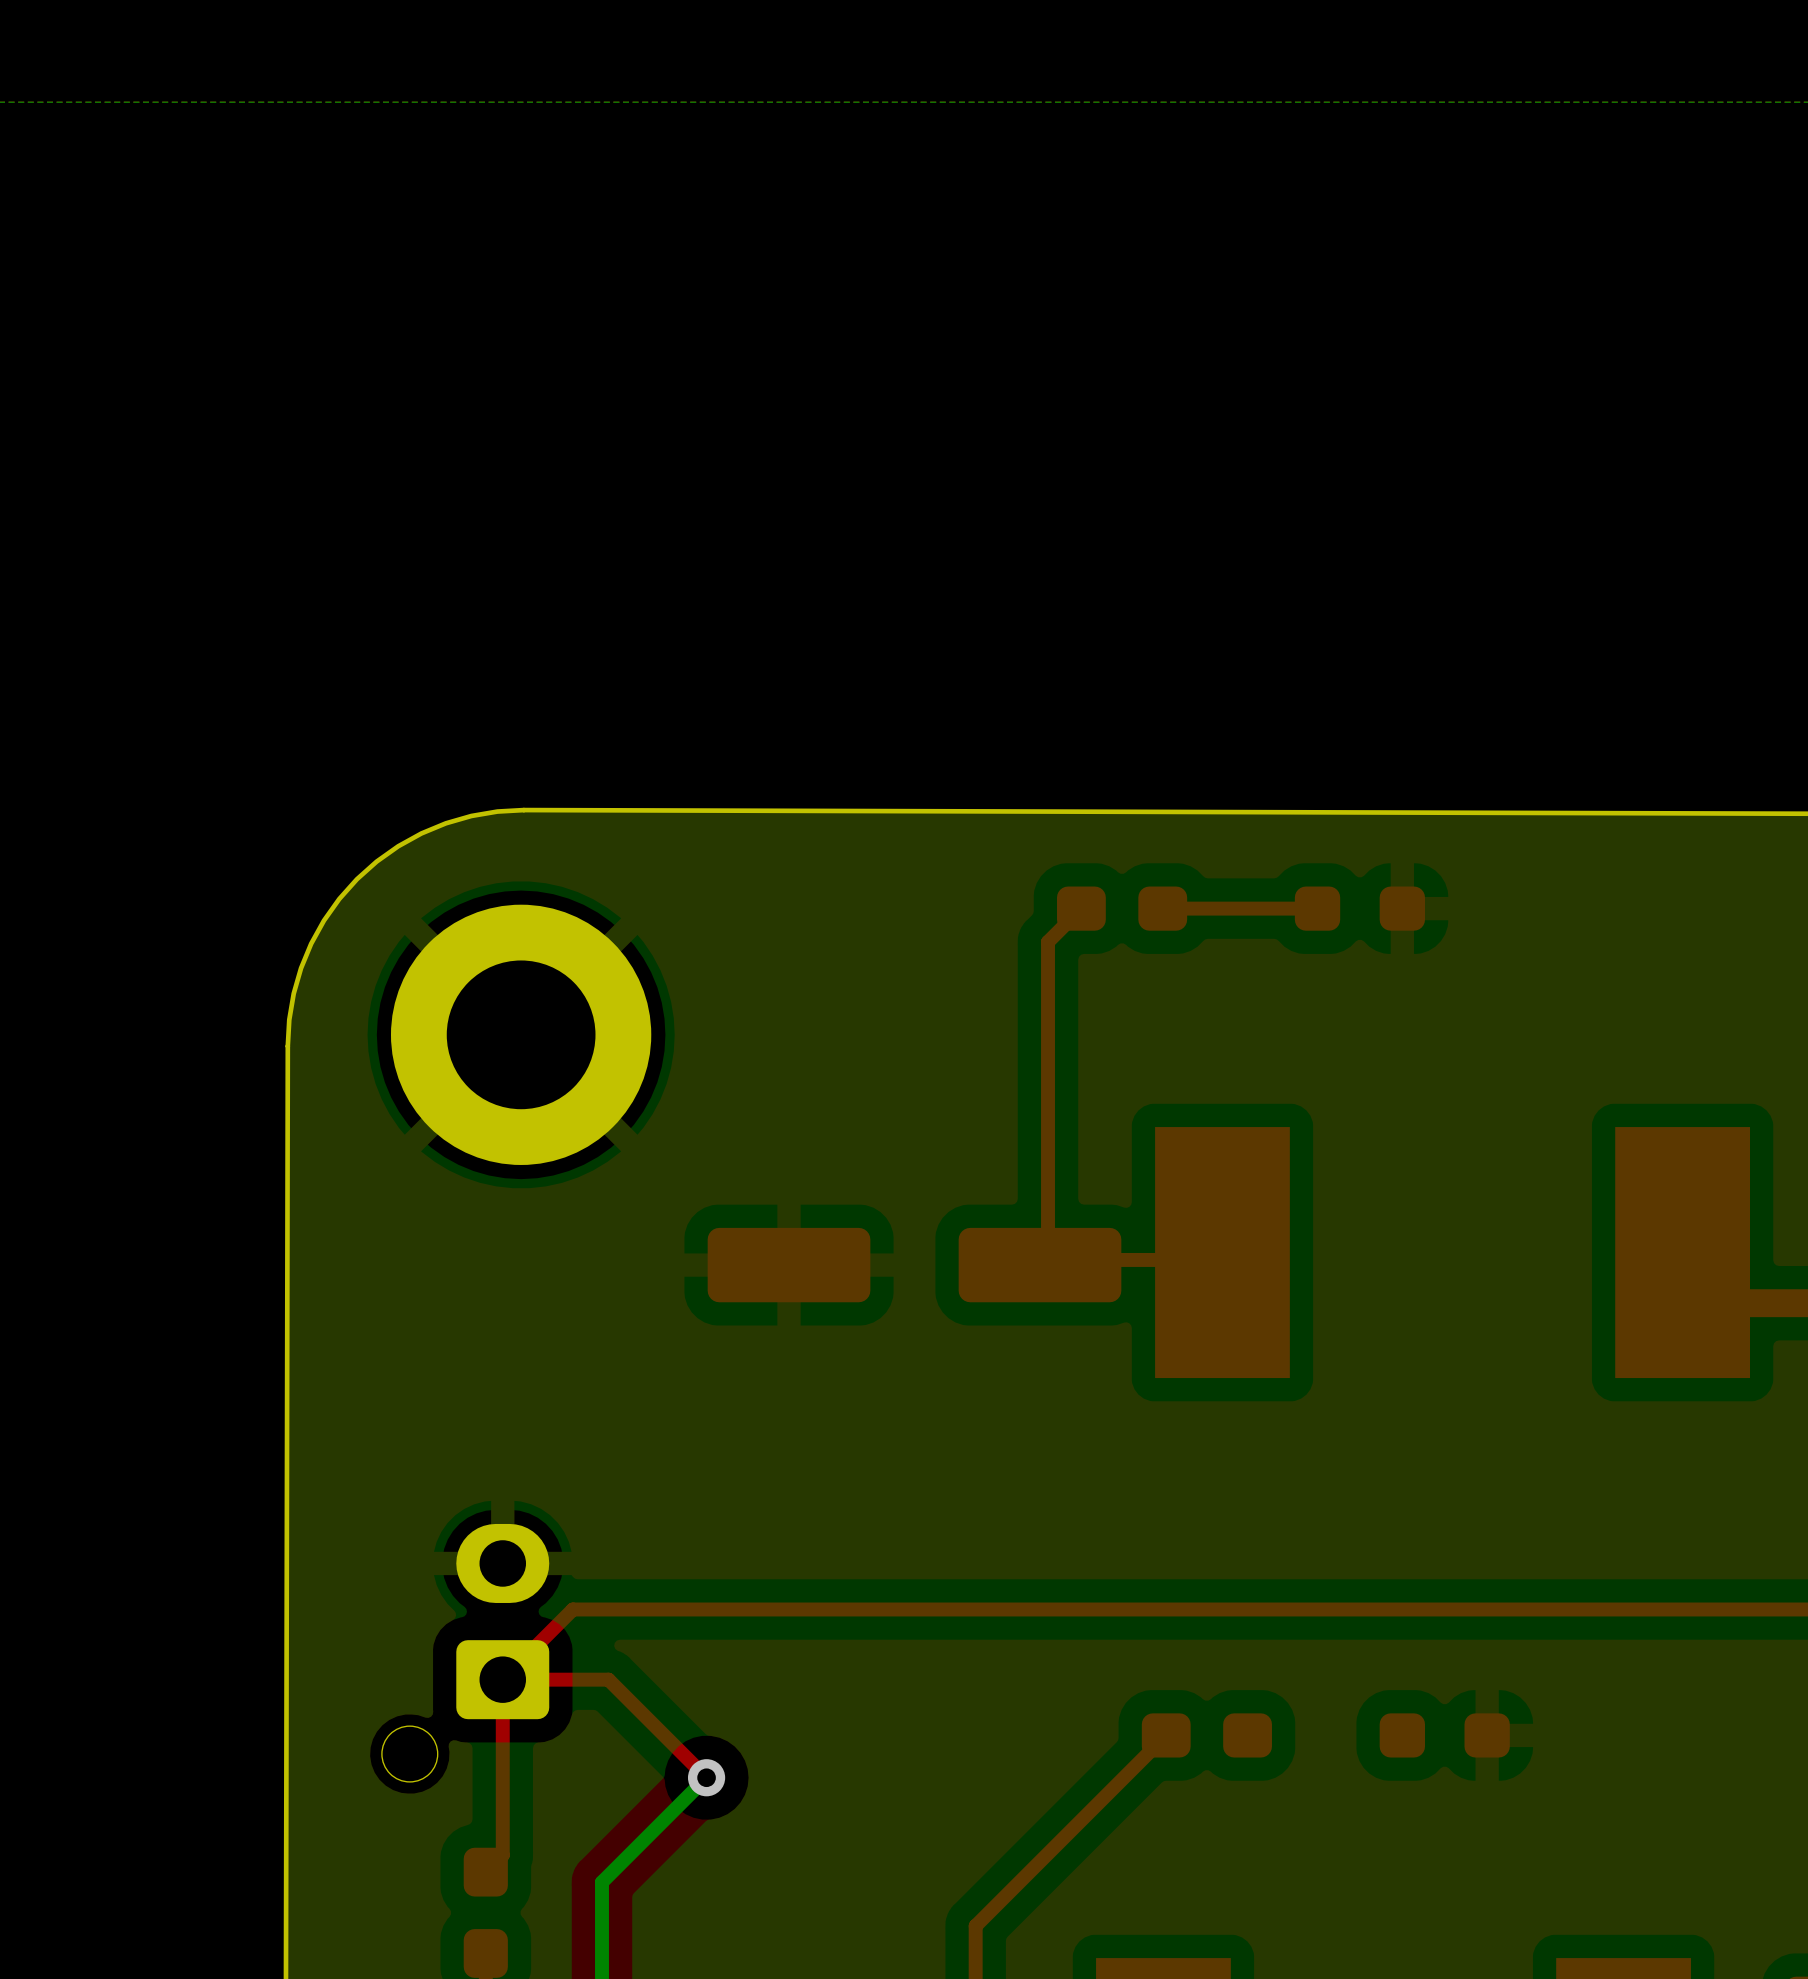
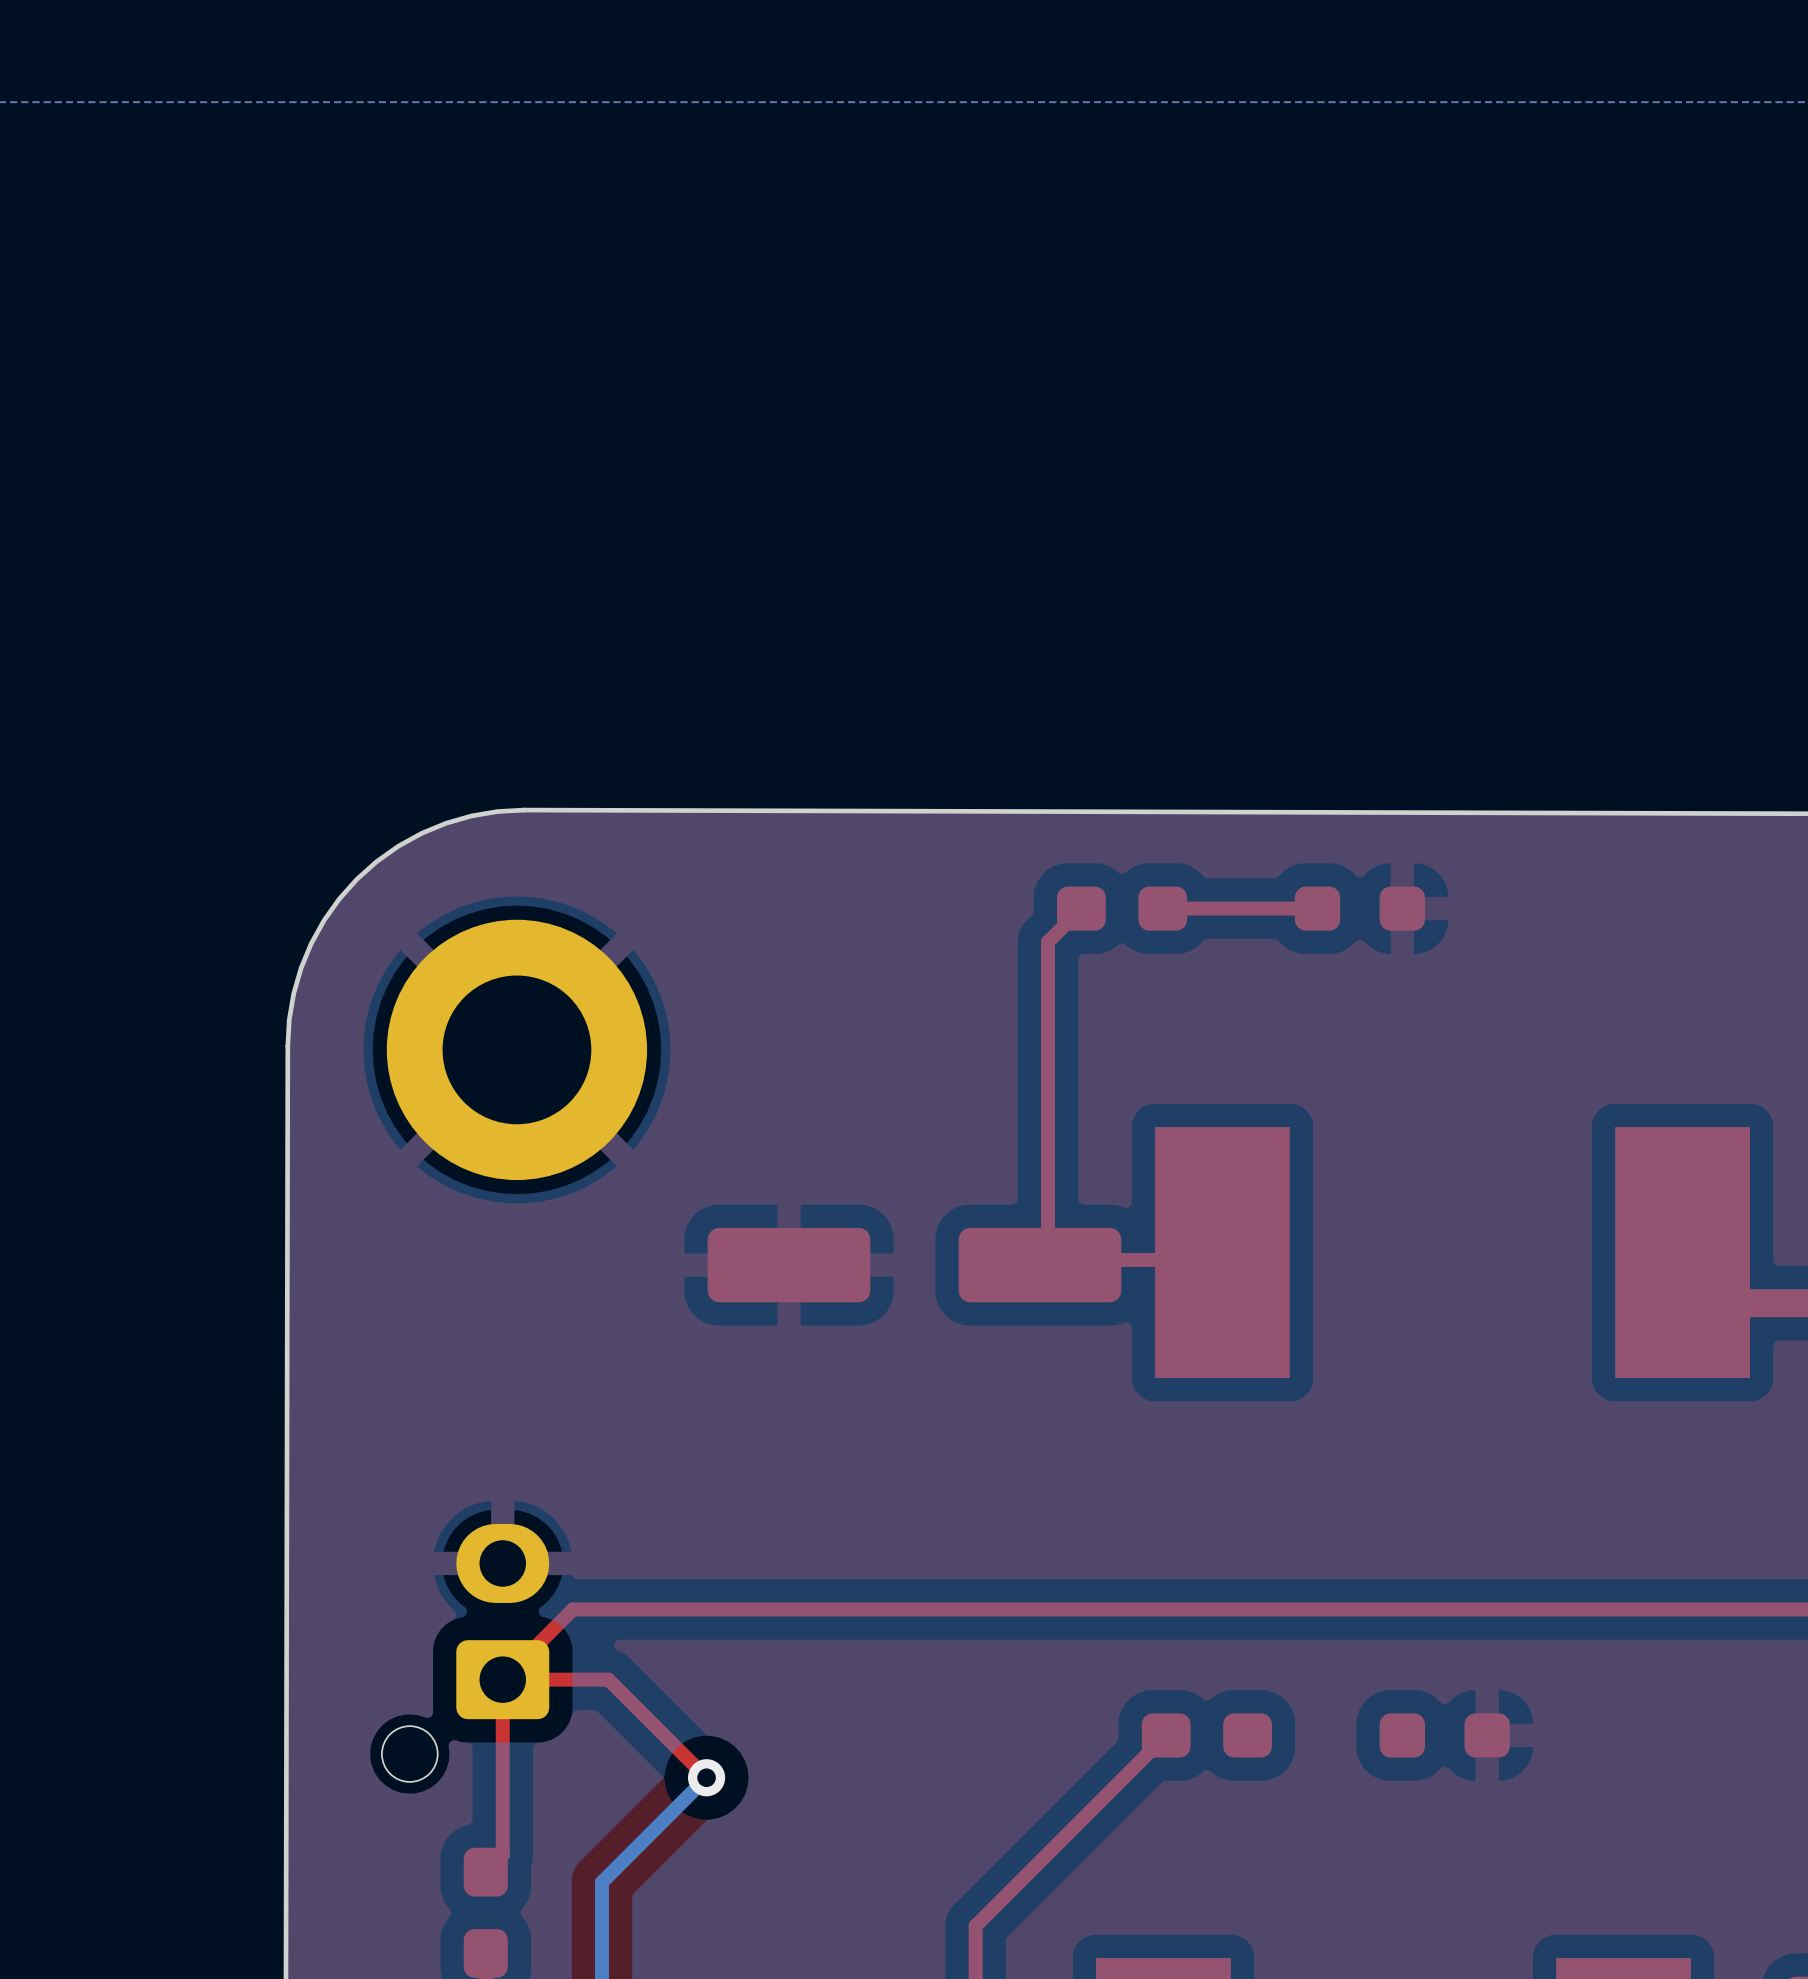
part position: (521, 1034) -> (516, 1049)

